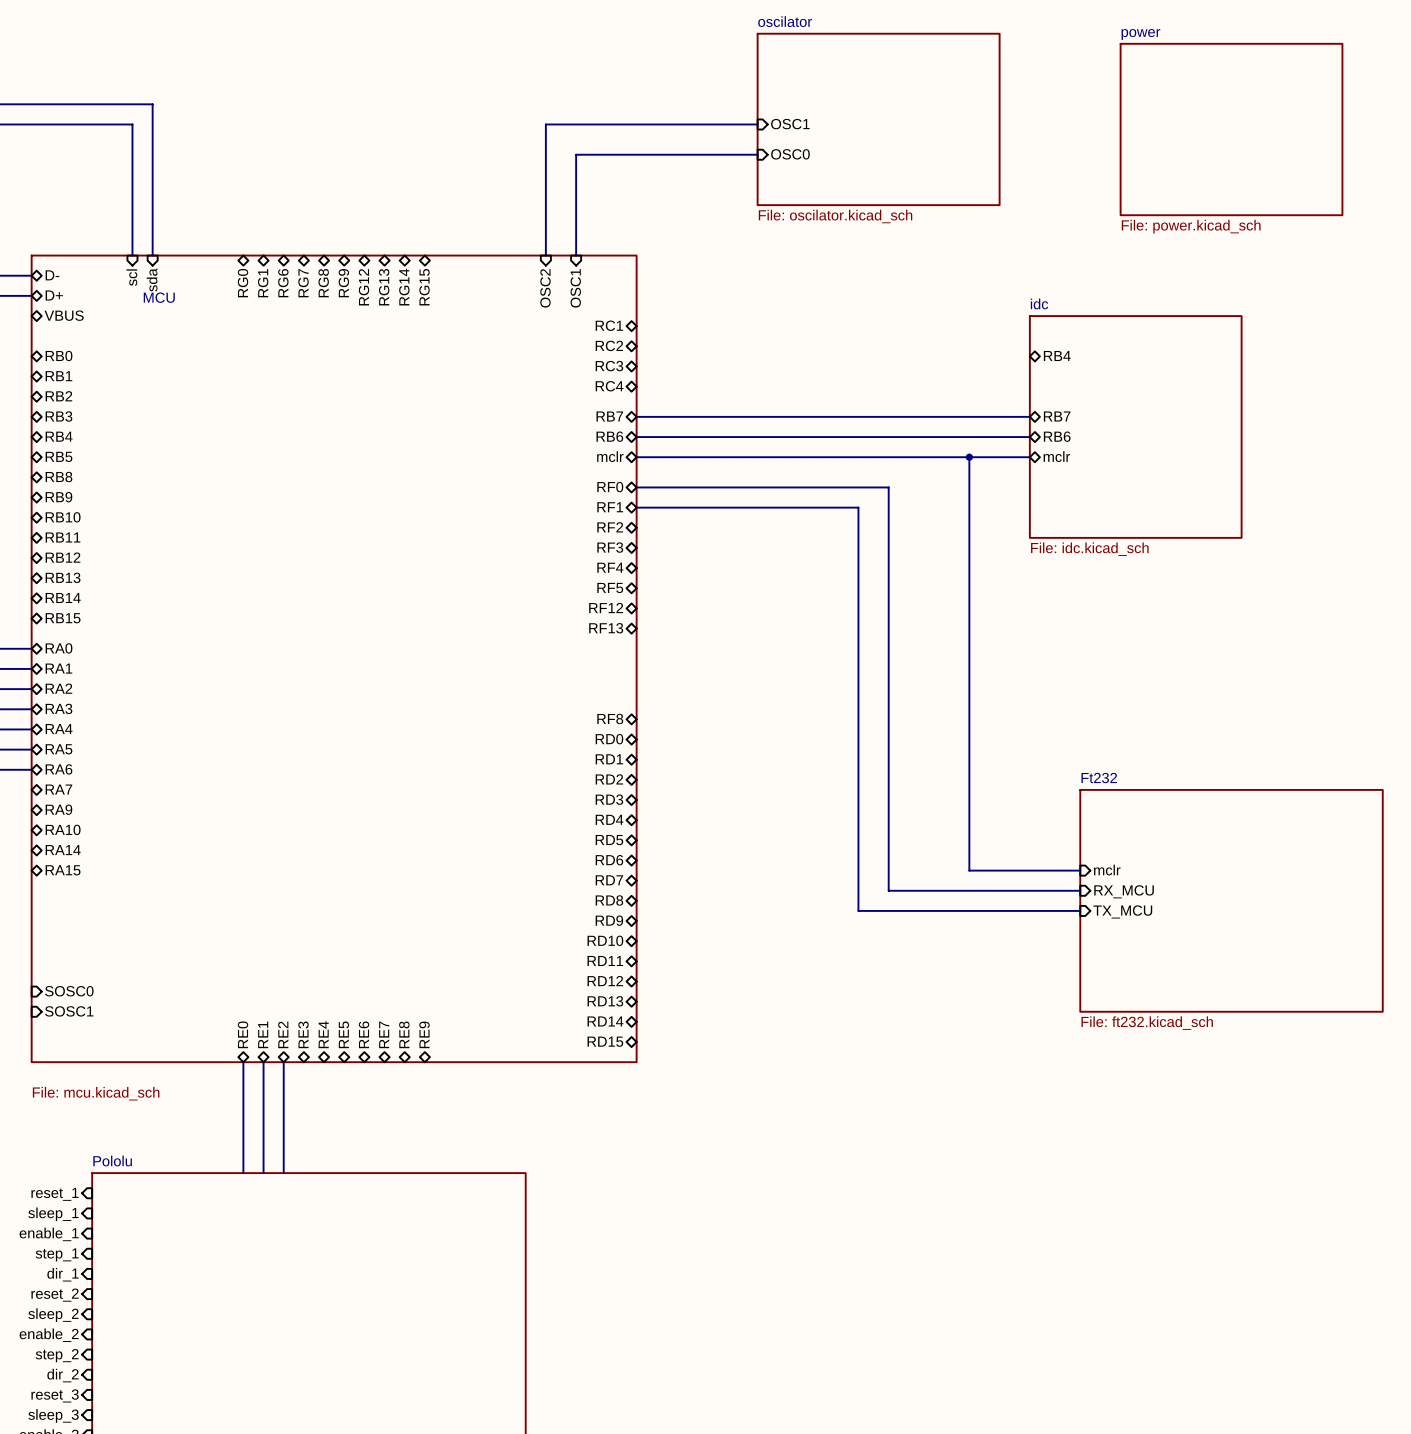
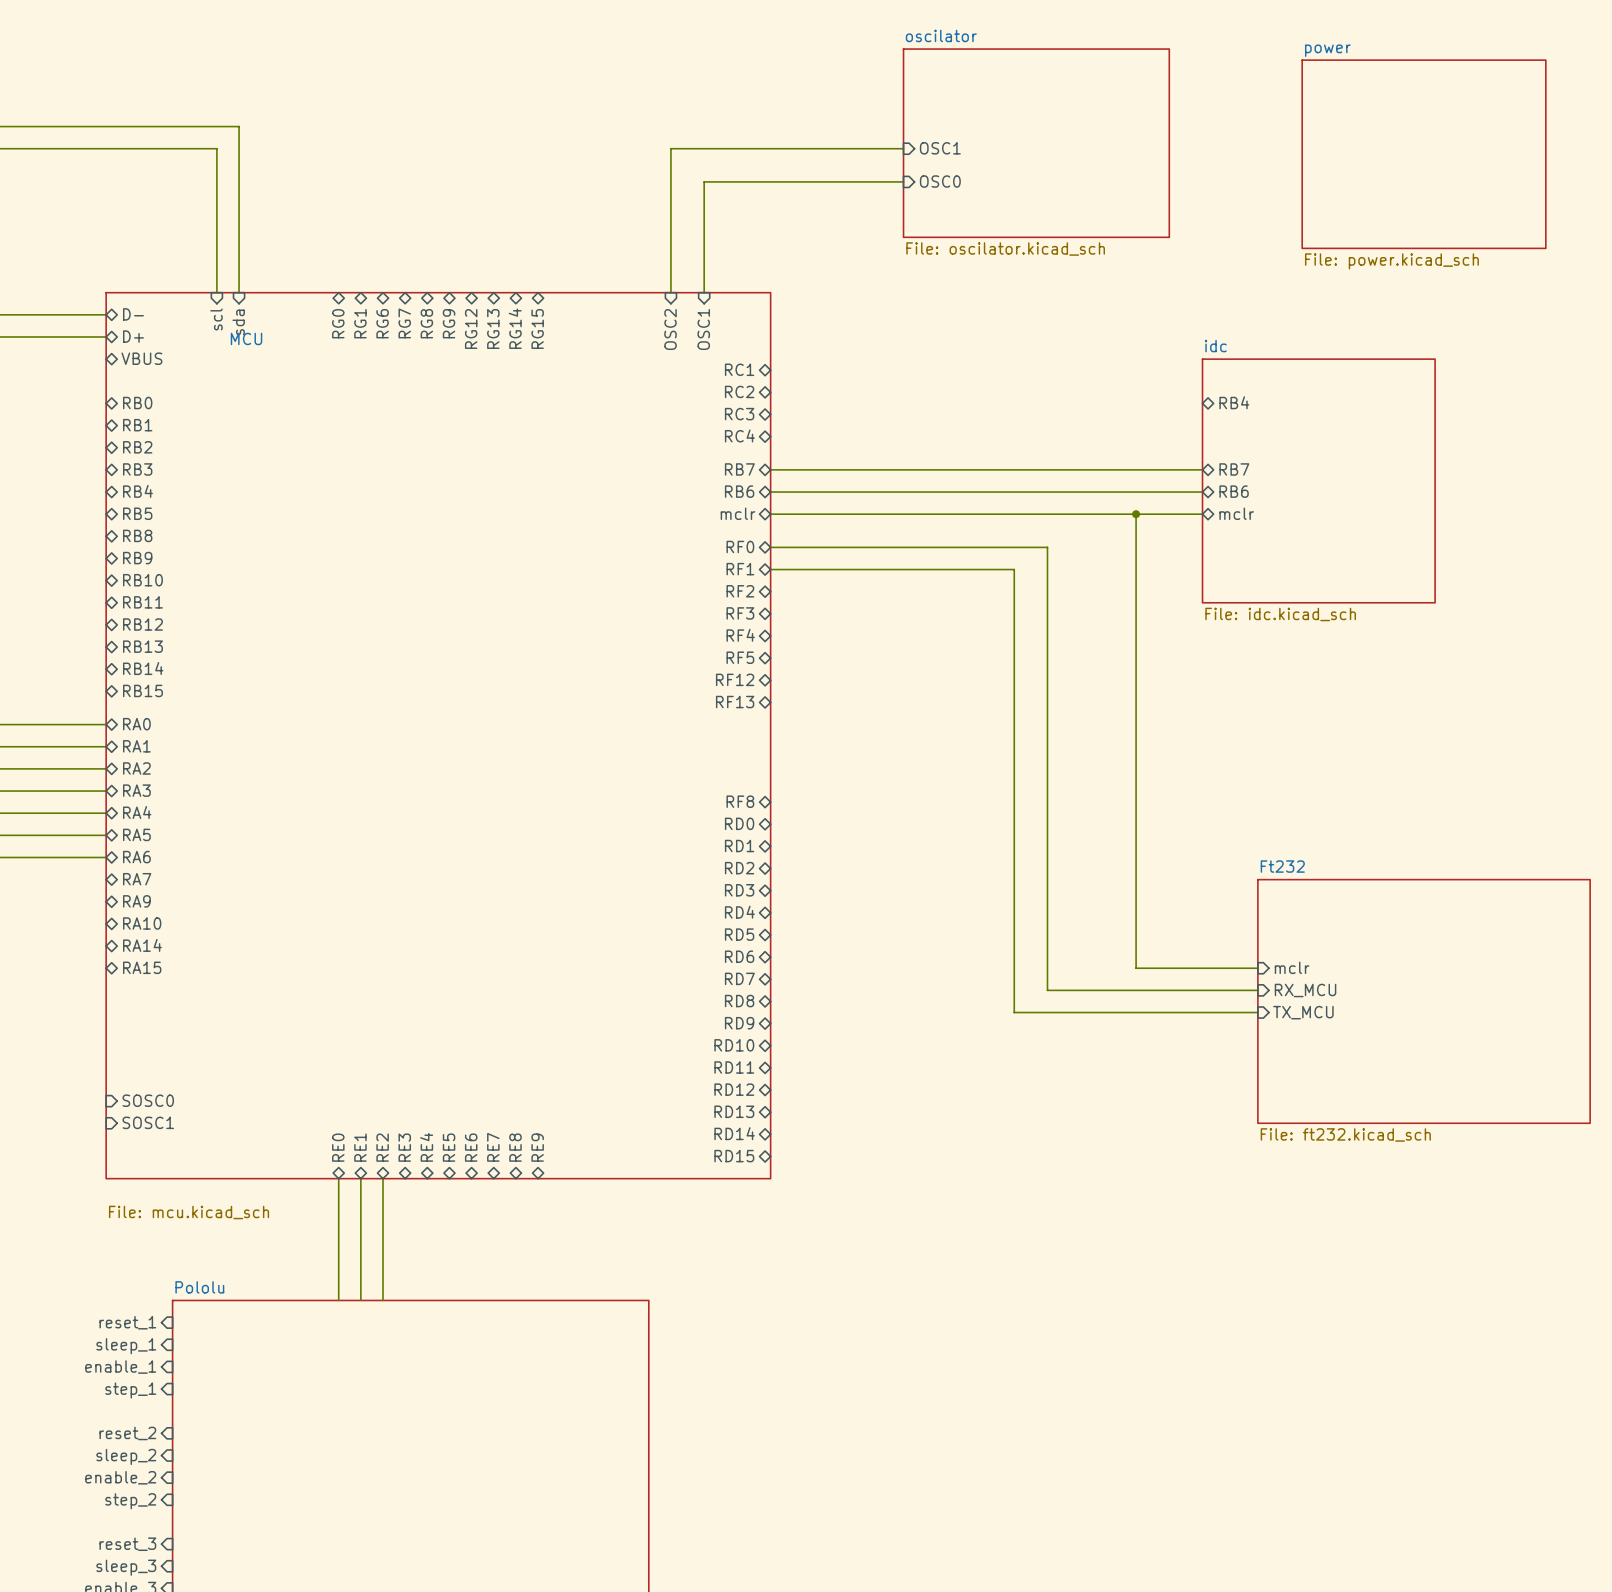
sheet pin: dir_1 (62, 1274) -> none
sheet pin: dir_2 (62, 1375) -> none

